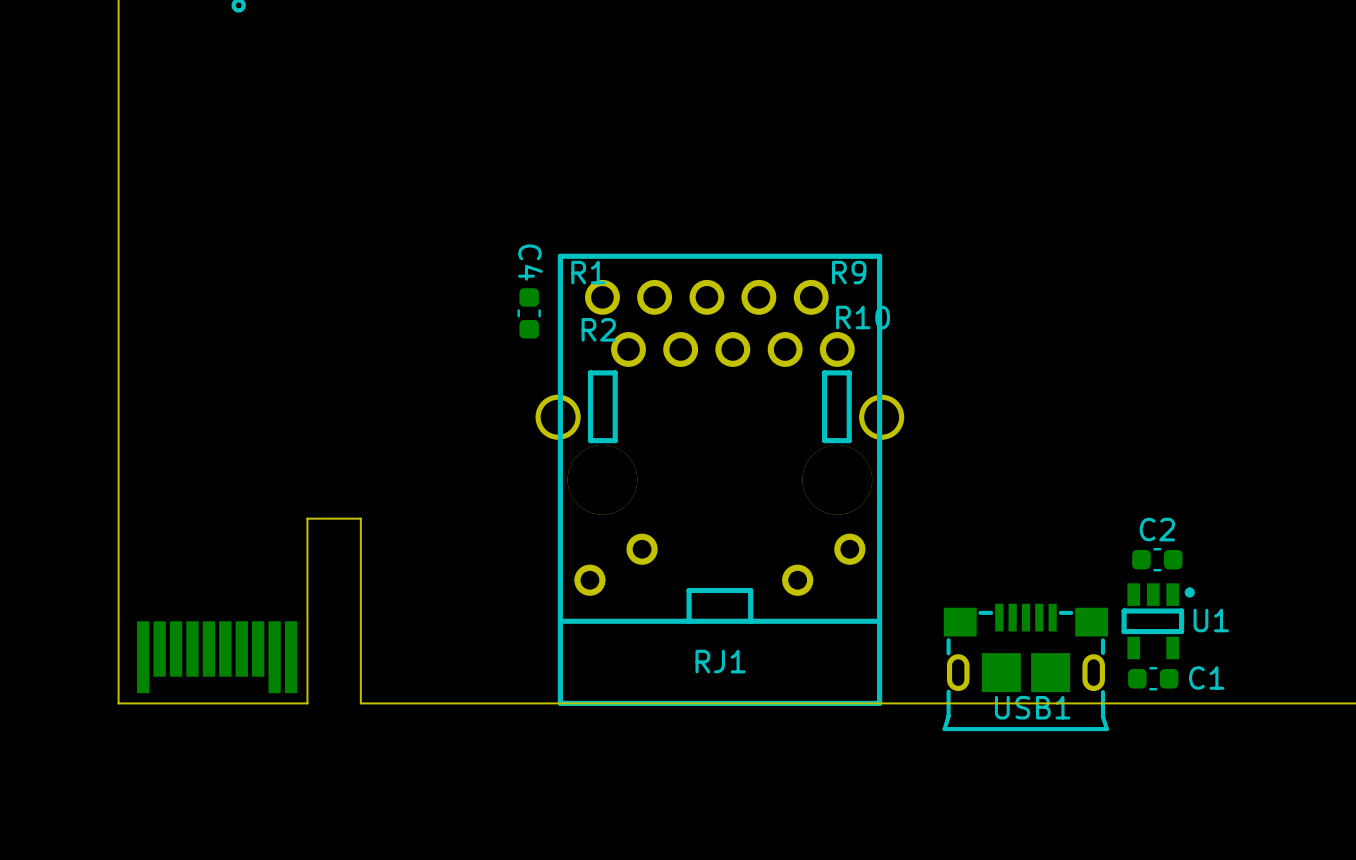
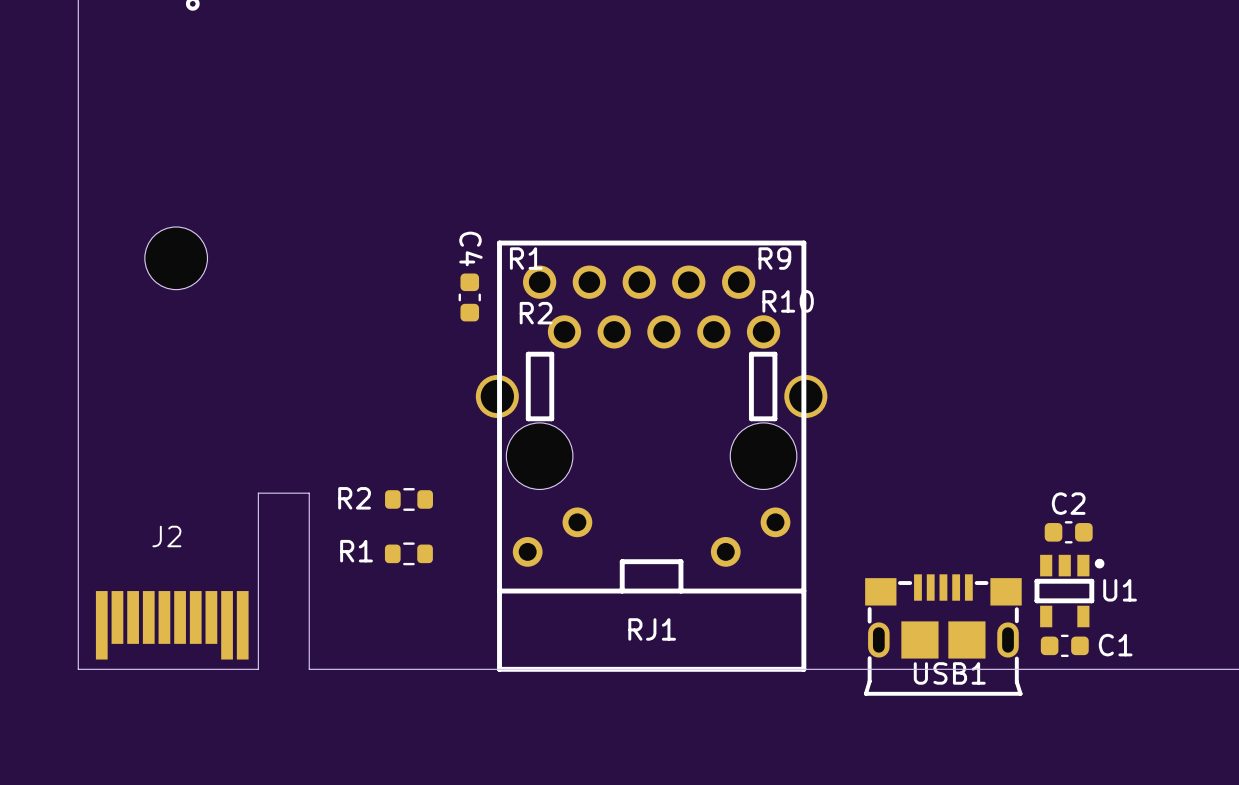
RJ1 footprint: [535, 253, 905, 706] -> [475, 240, 828, 672]
part: none -> (176, 258)
R2: none -> (409, 499)
J2 name: none -> J2 (166, 536)
R1: none -> (408, 553)

